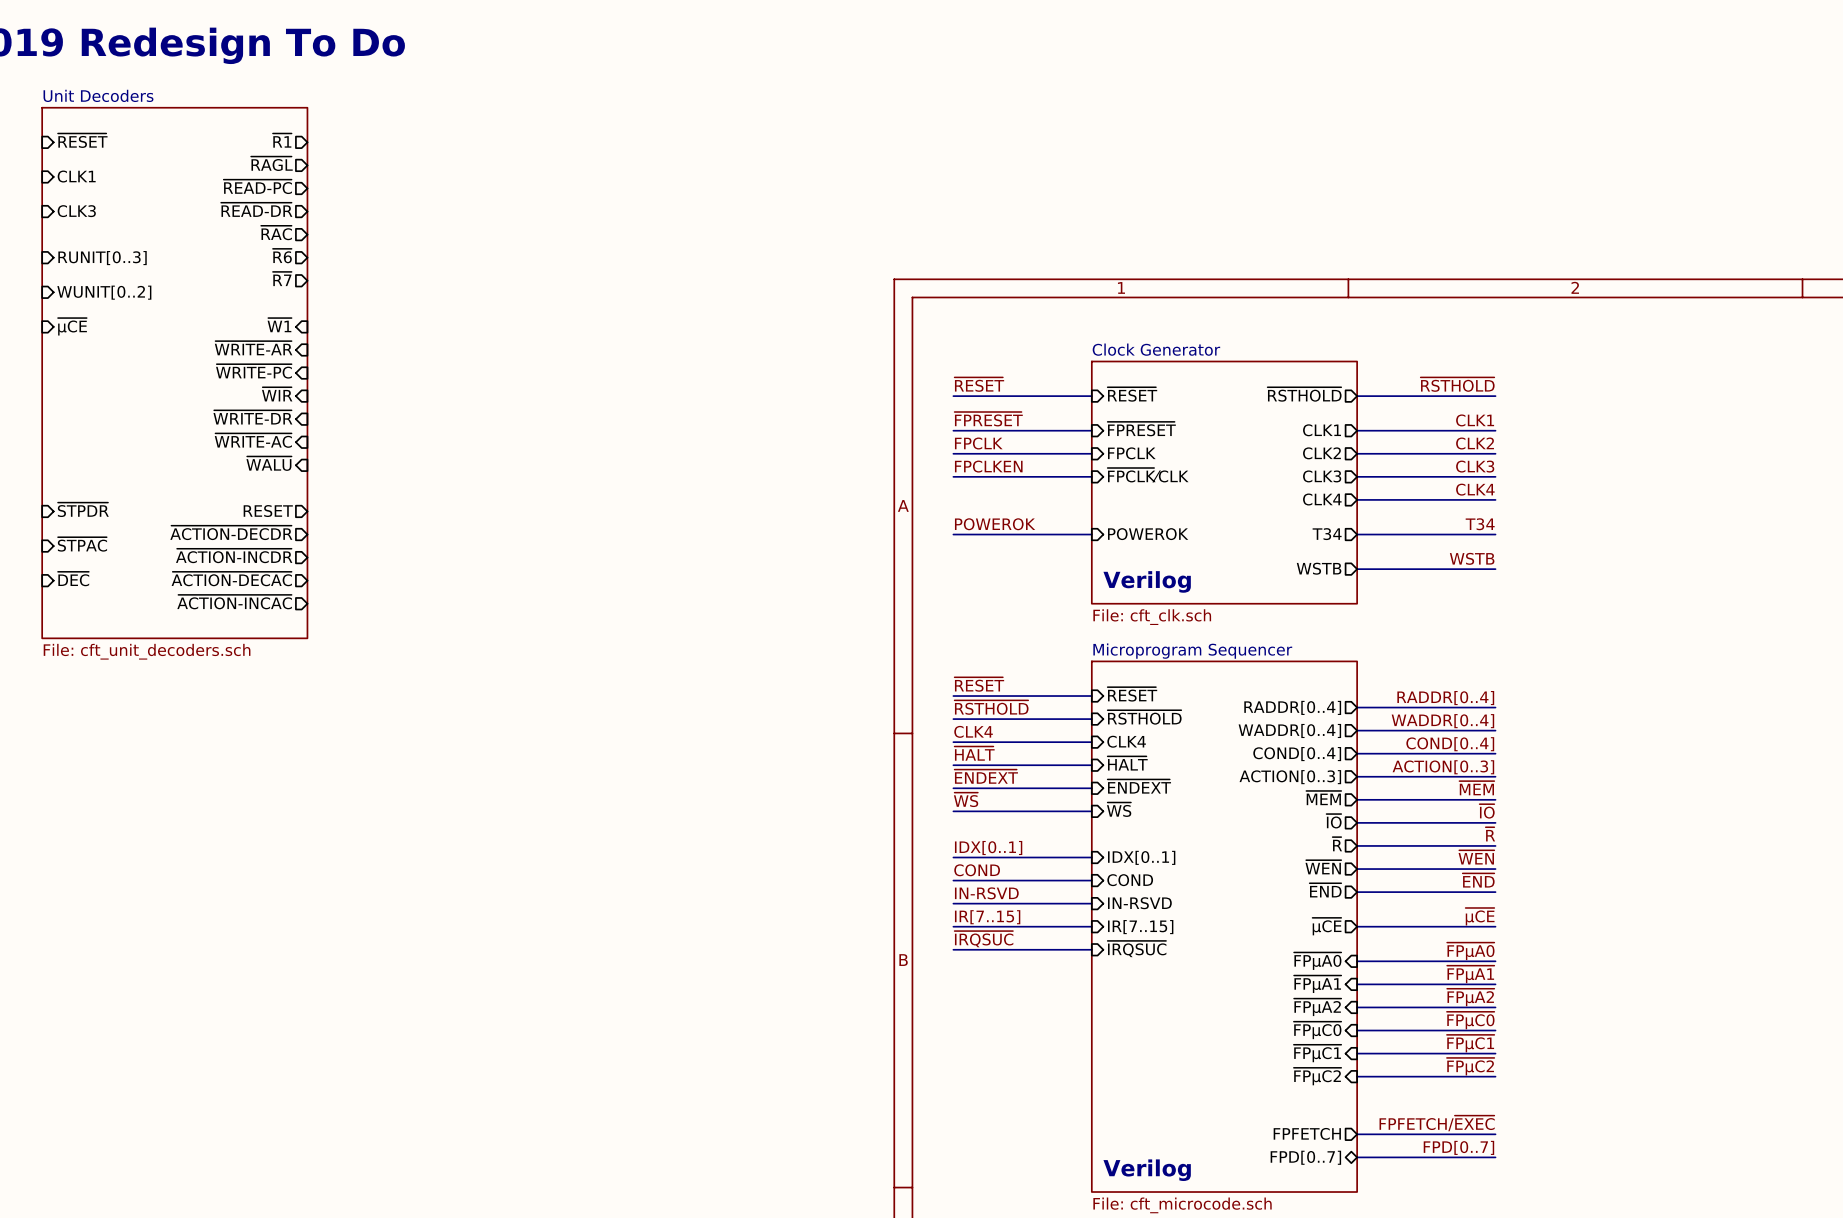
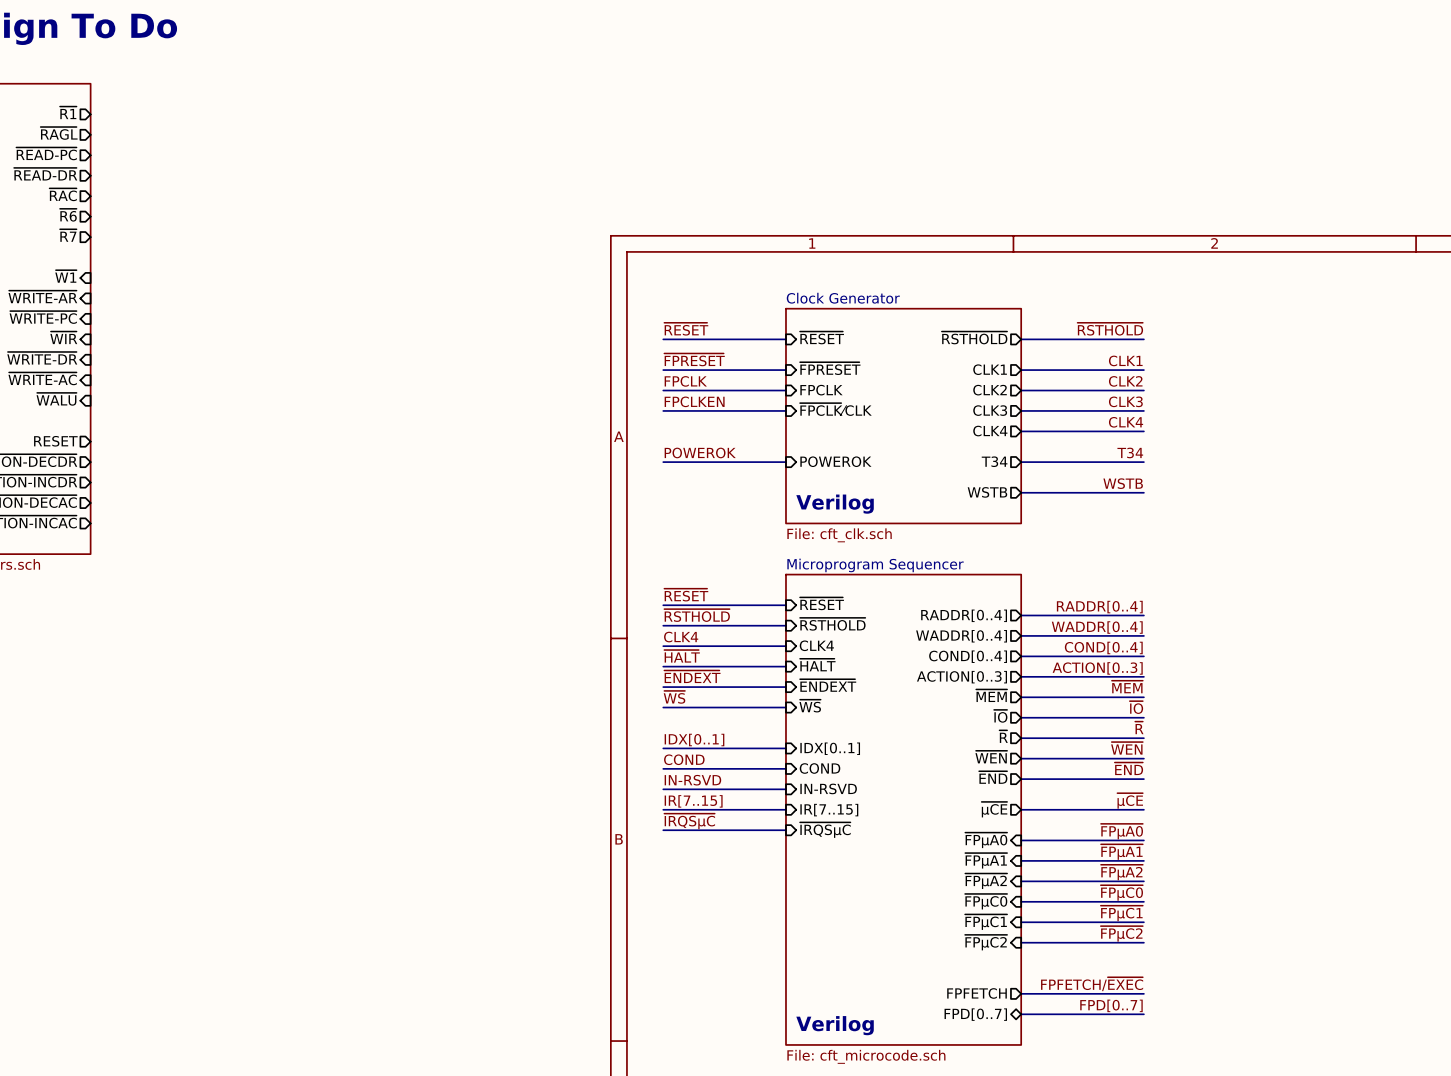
label: ~{IRQSUC} (983, 939) -> ~{IRQSµC} (689, 821)
sheet pin: ~{IRQSUC} (1137, 949) -> ~{IRQSµC} (825, 830)

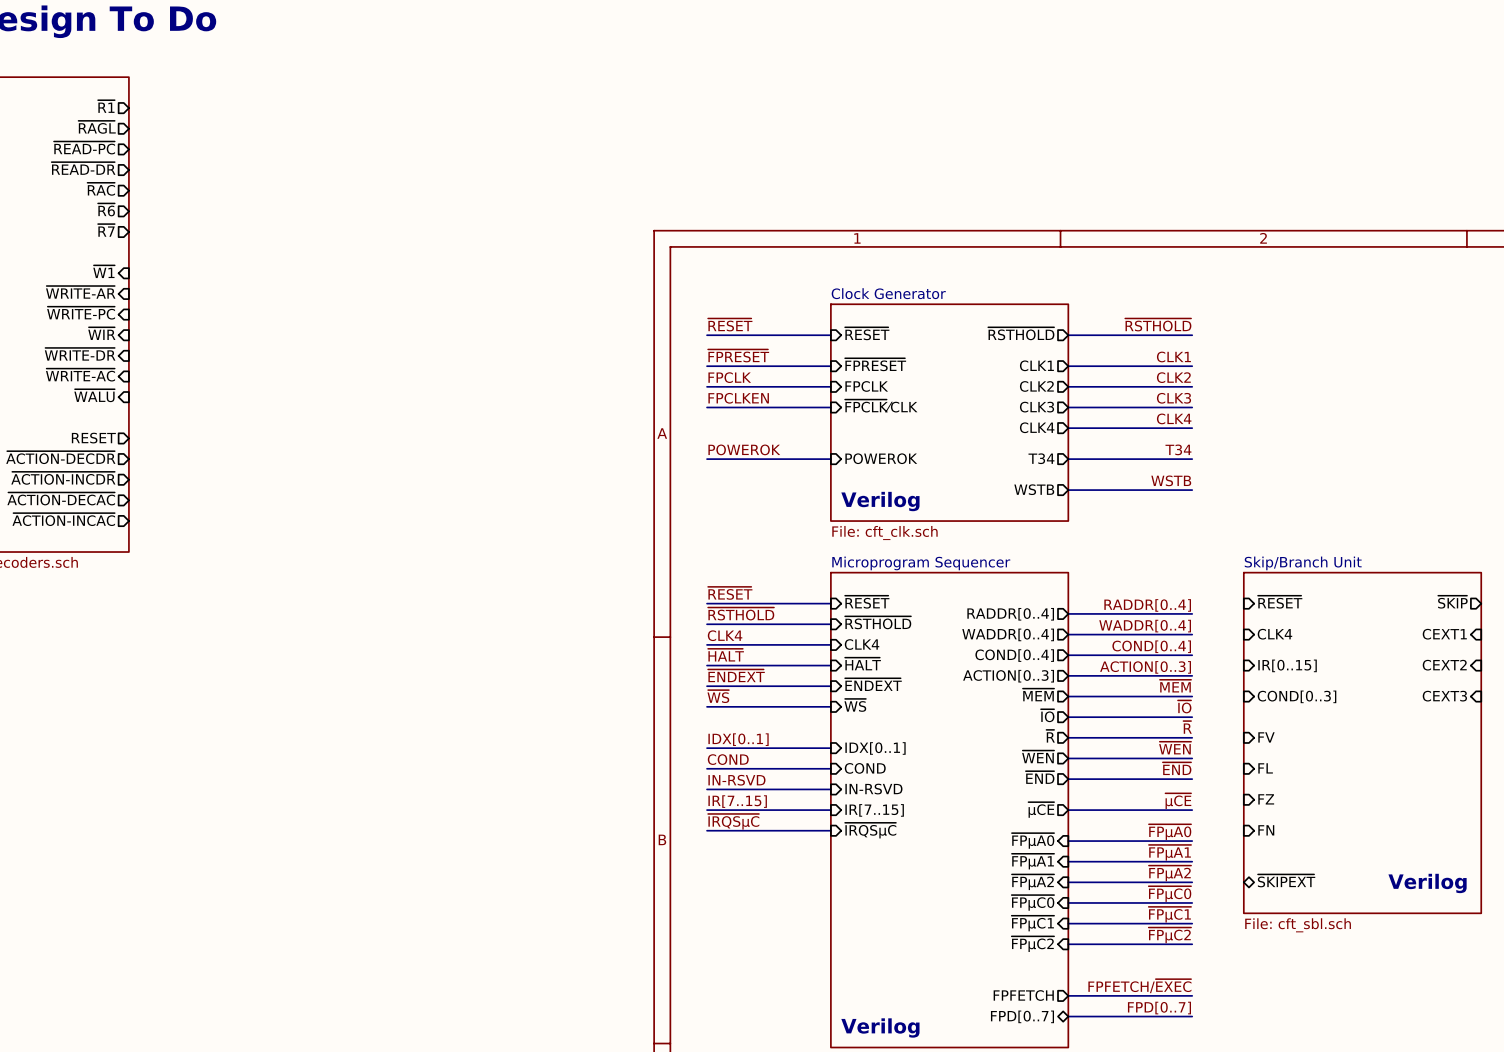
sheet pin: none -> ~{RESET} (1280, 602)
sheet pin: none -> ~{SKIP} (1452, 602)
sheet pin: none -> CLK4 (1274, 634)
sheet pin: none -> CEXT1 (1444, 634)
sheet pin: none -> IR[0..15] (1287, 665)
sheet pin: none -> CEXT2 (1444, 665)
sheet pin: none -> CEXT3 (1444, 696)
sheet pin: none -> COND[0..3] (1297, 696)
sheet pin: none -> FV (1266, 737)
sheet Skip/Branch Unit: none -> File: cft_sbl.sch (1362, 742)
sheet pin: none -> FL (1265, 768)
sheet pin: none -> FZ (1266, 799)
sheet pin: none -> FN (1266, 830)
sheet pin: none -> ~{SKIPEXT} (1286, 880)
text: none -> Verilog (1427, 883)

